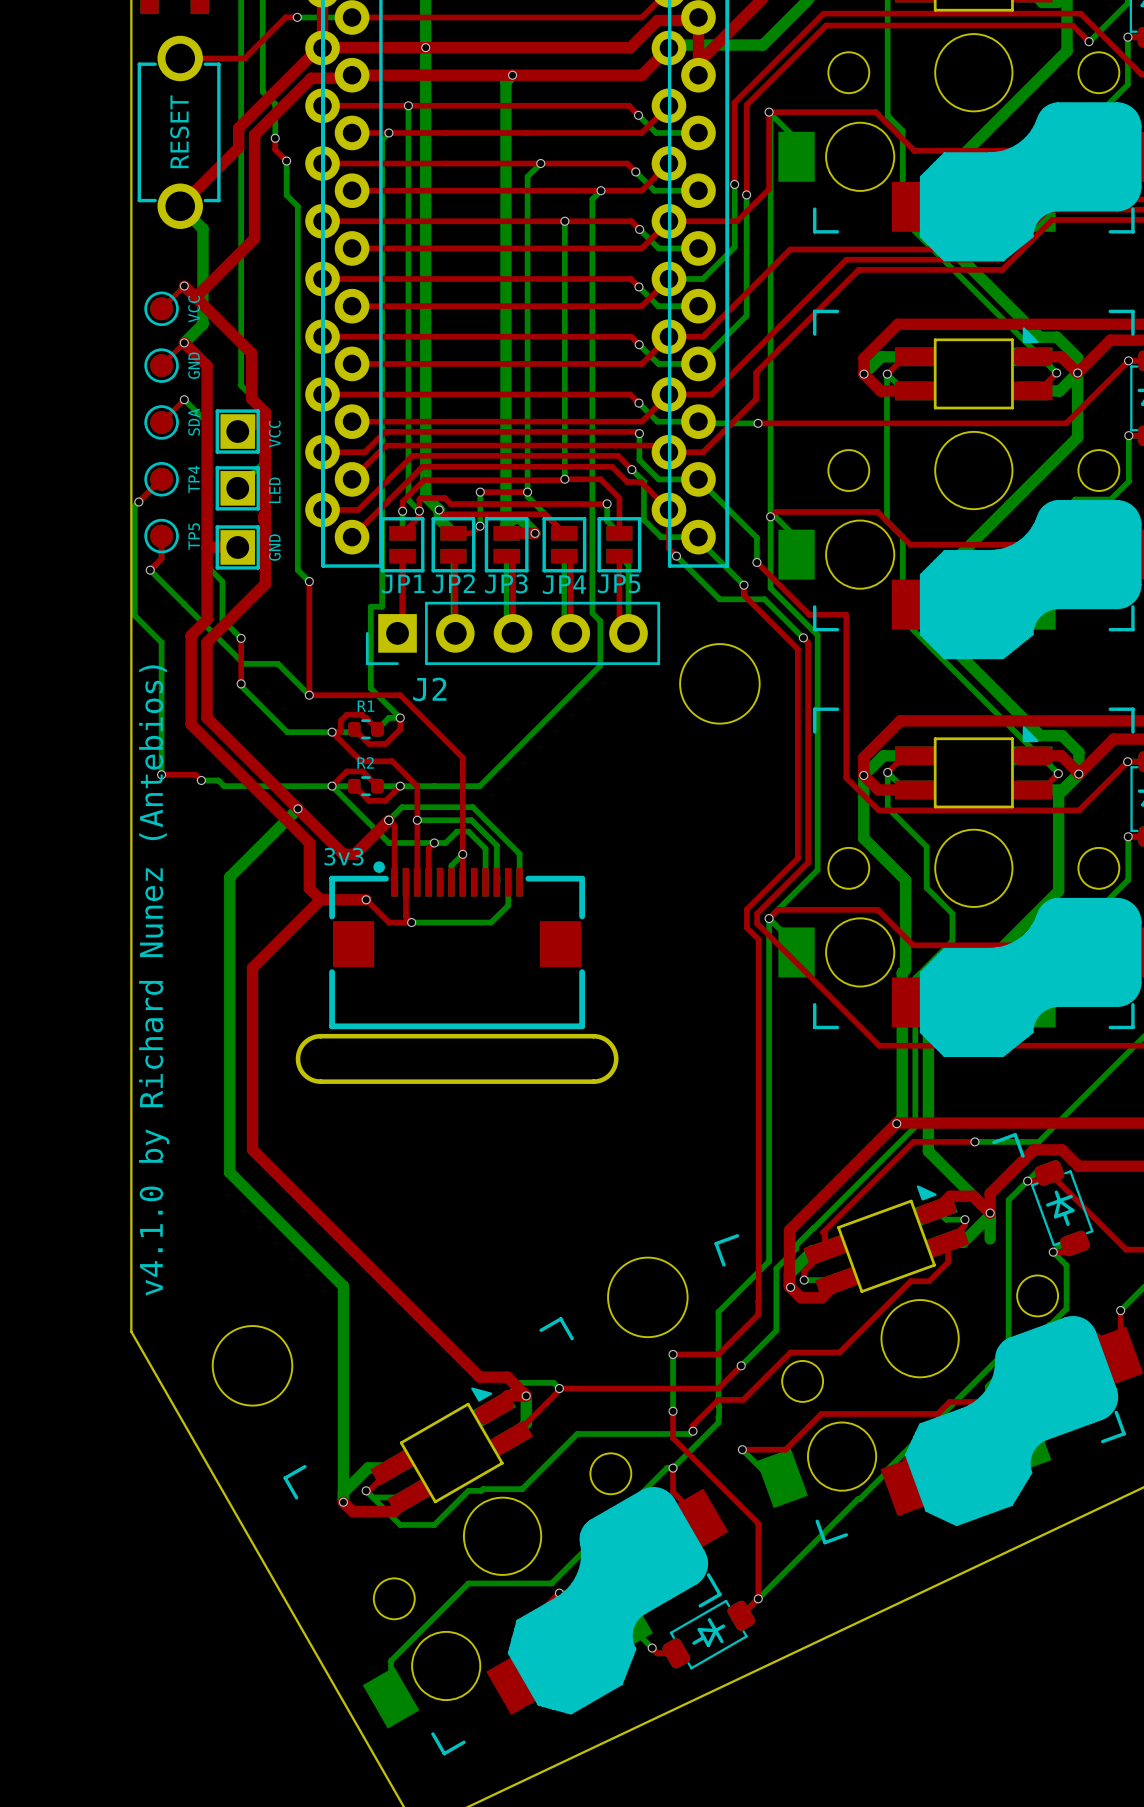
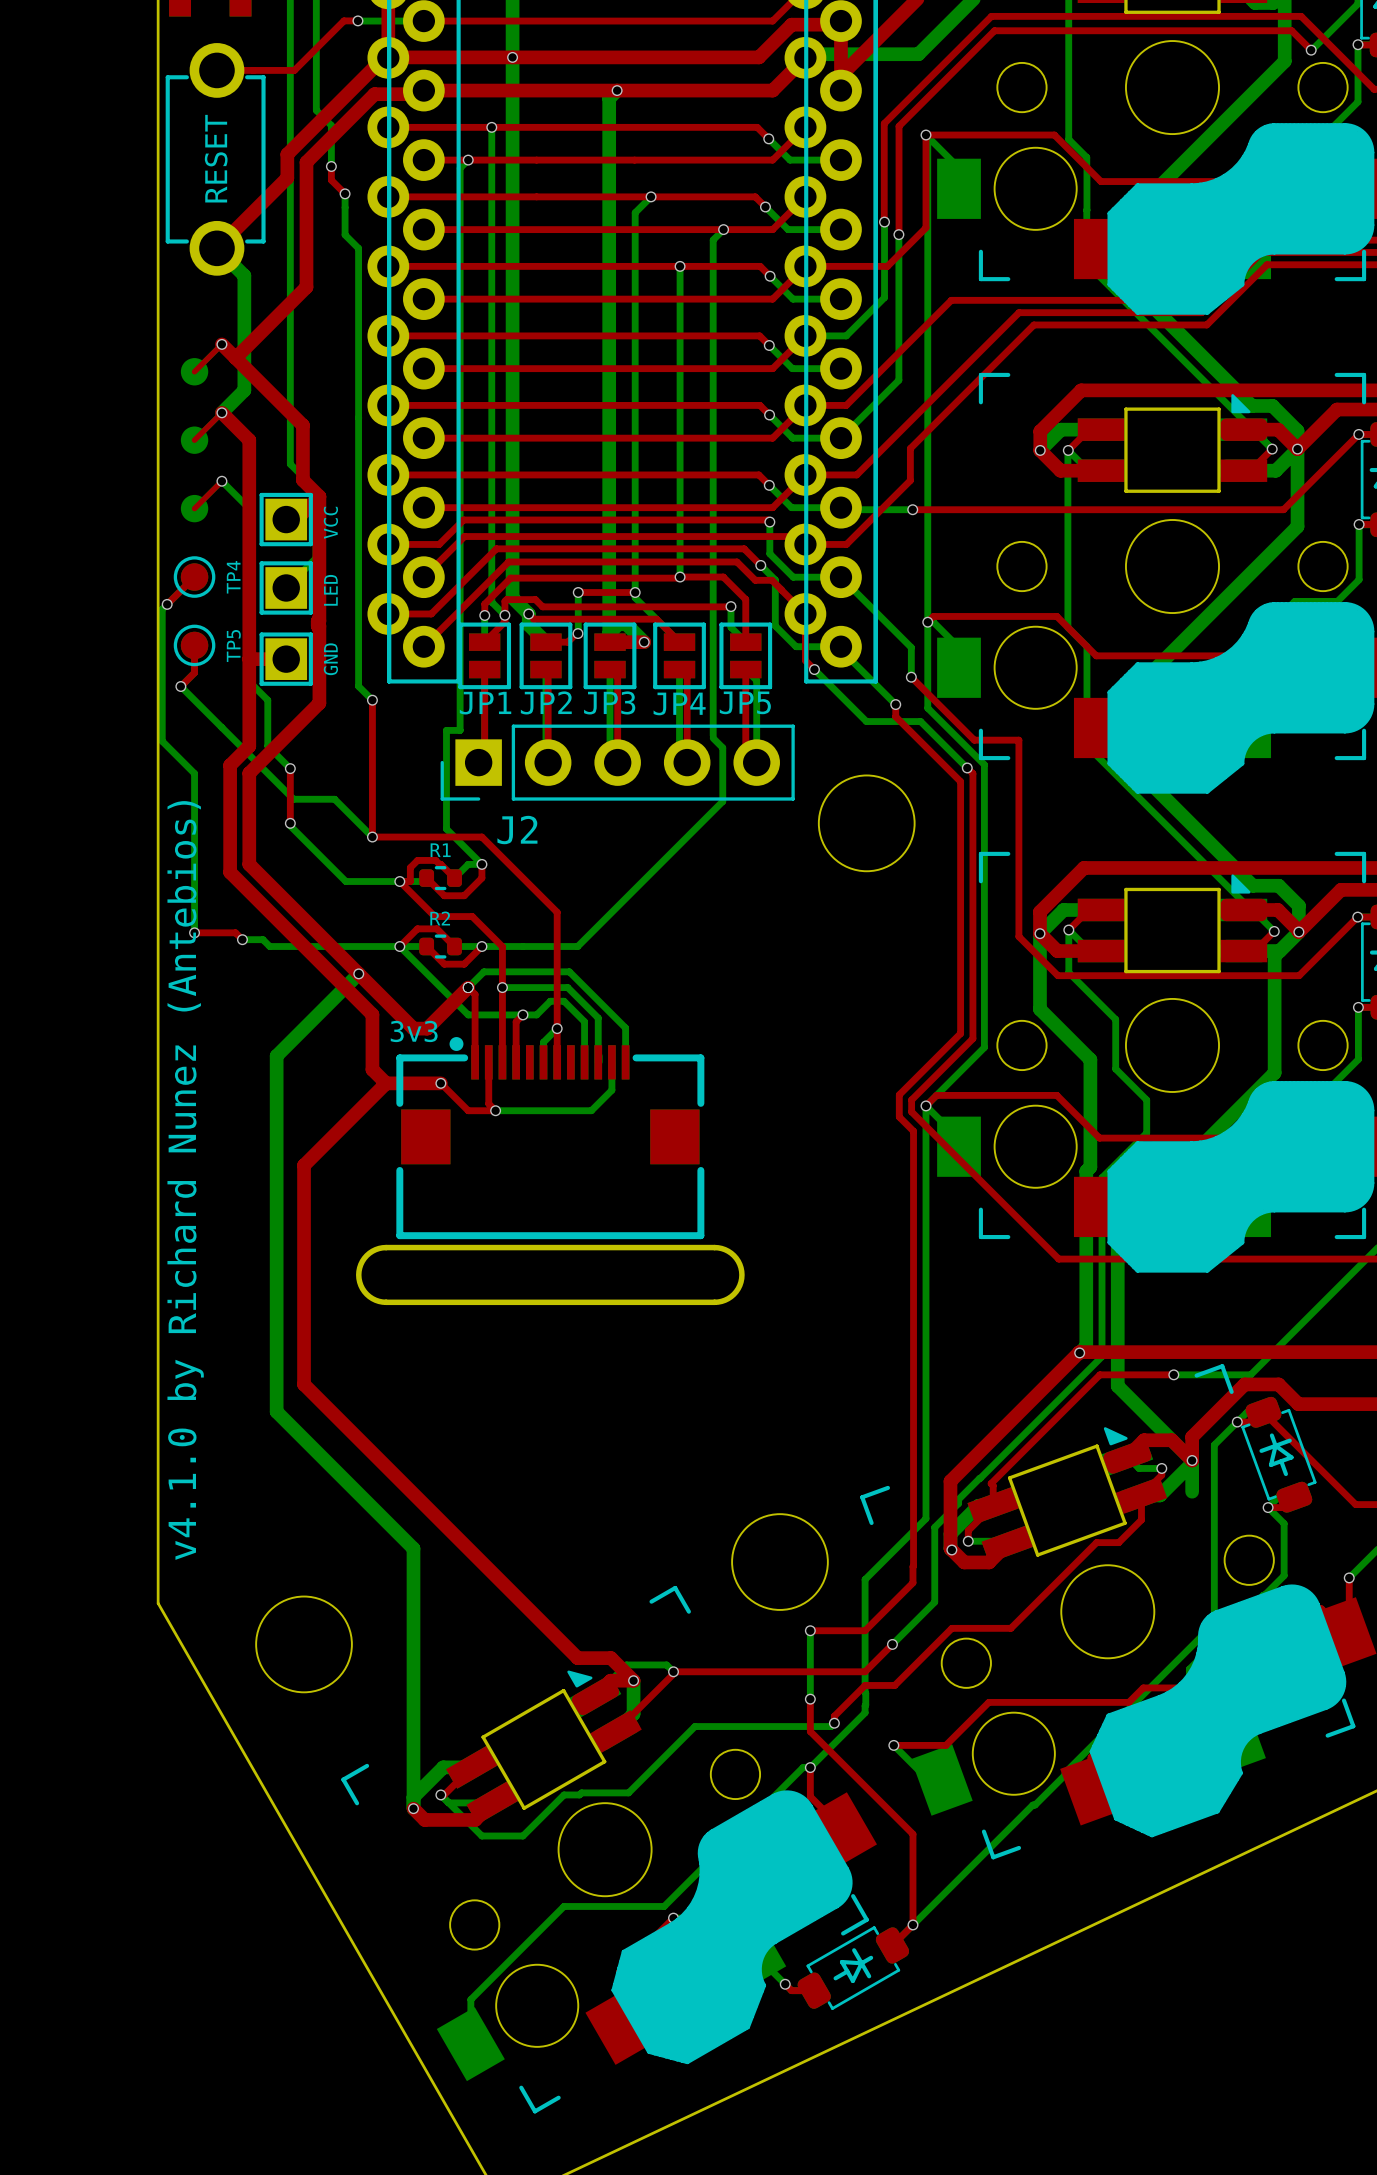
VCC: (161, 308) -> none
GND: (161, 365) -> none
SDA: (161, 422) -> none

